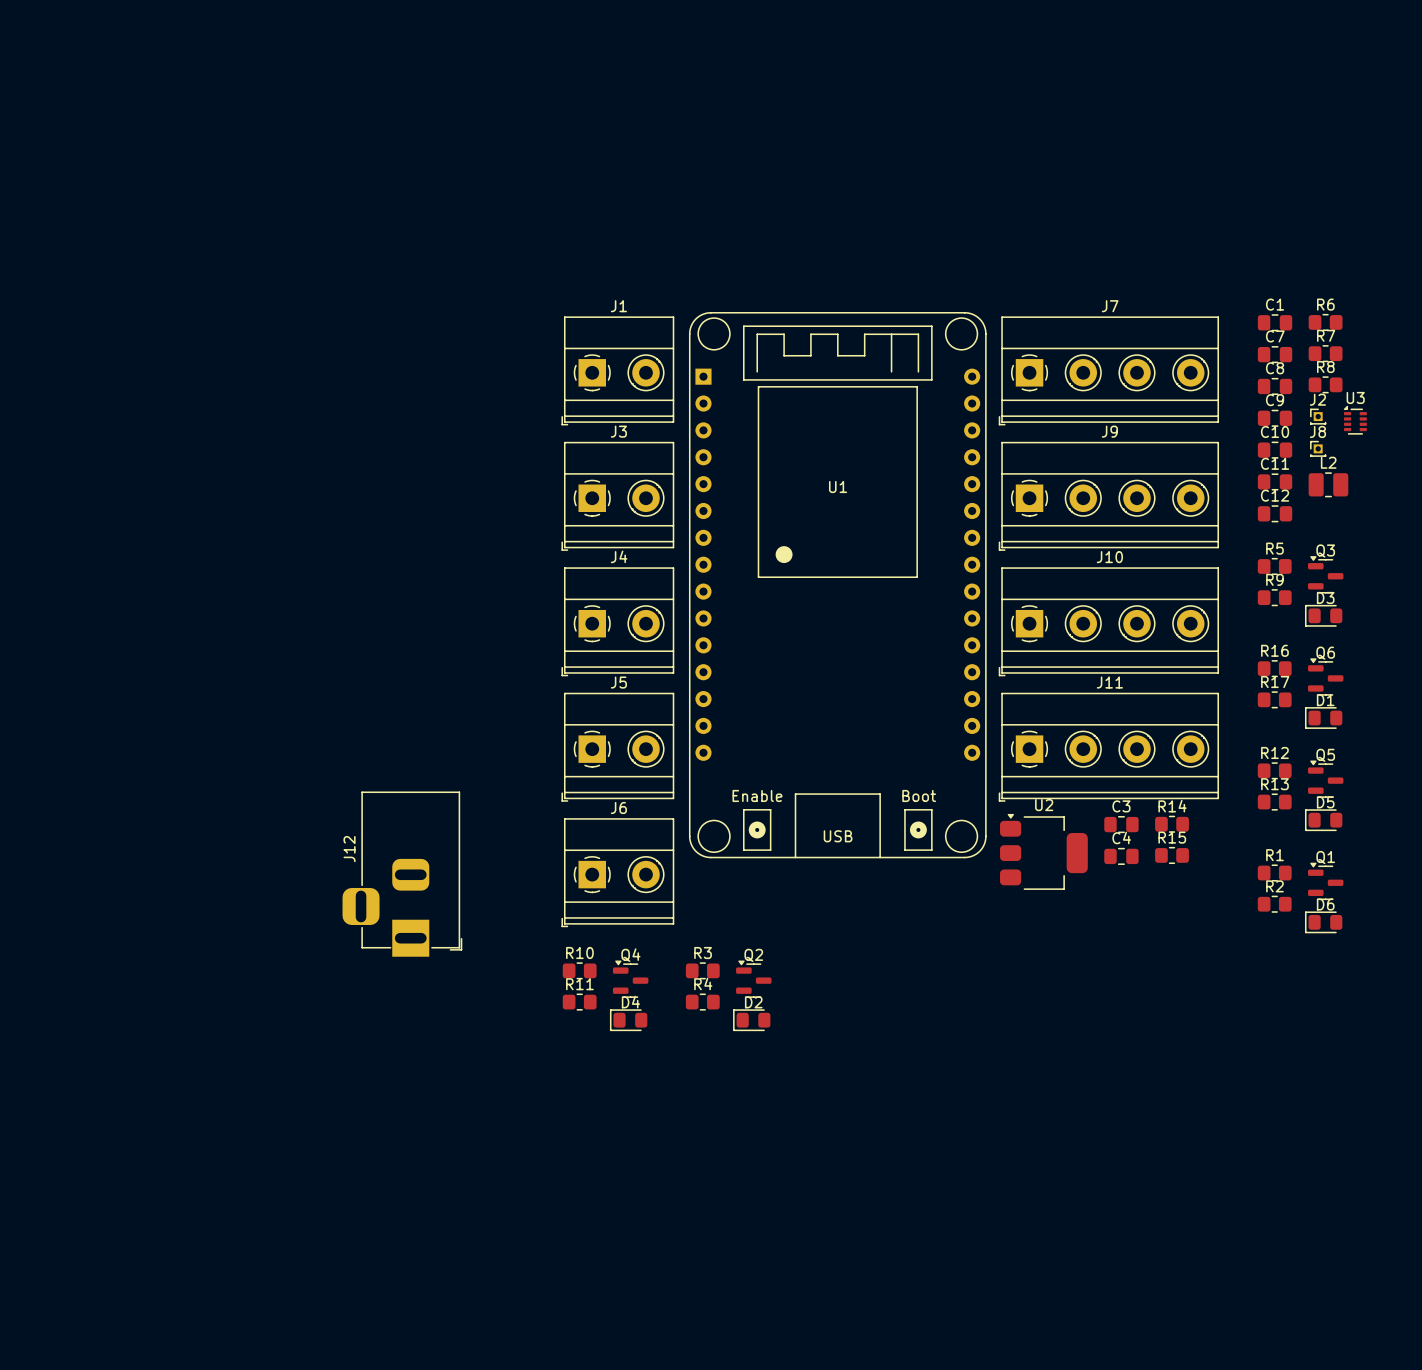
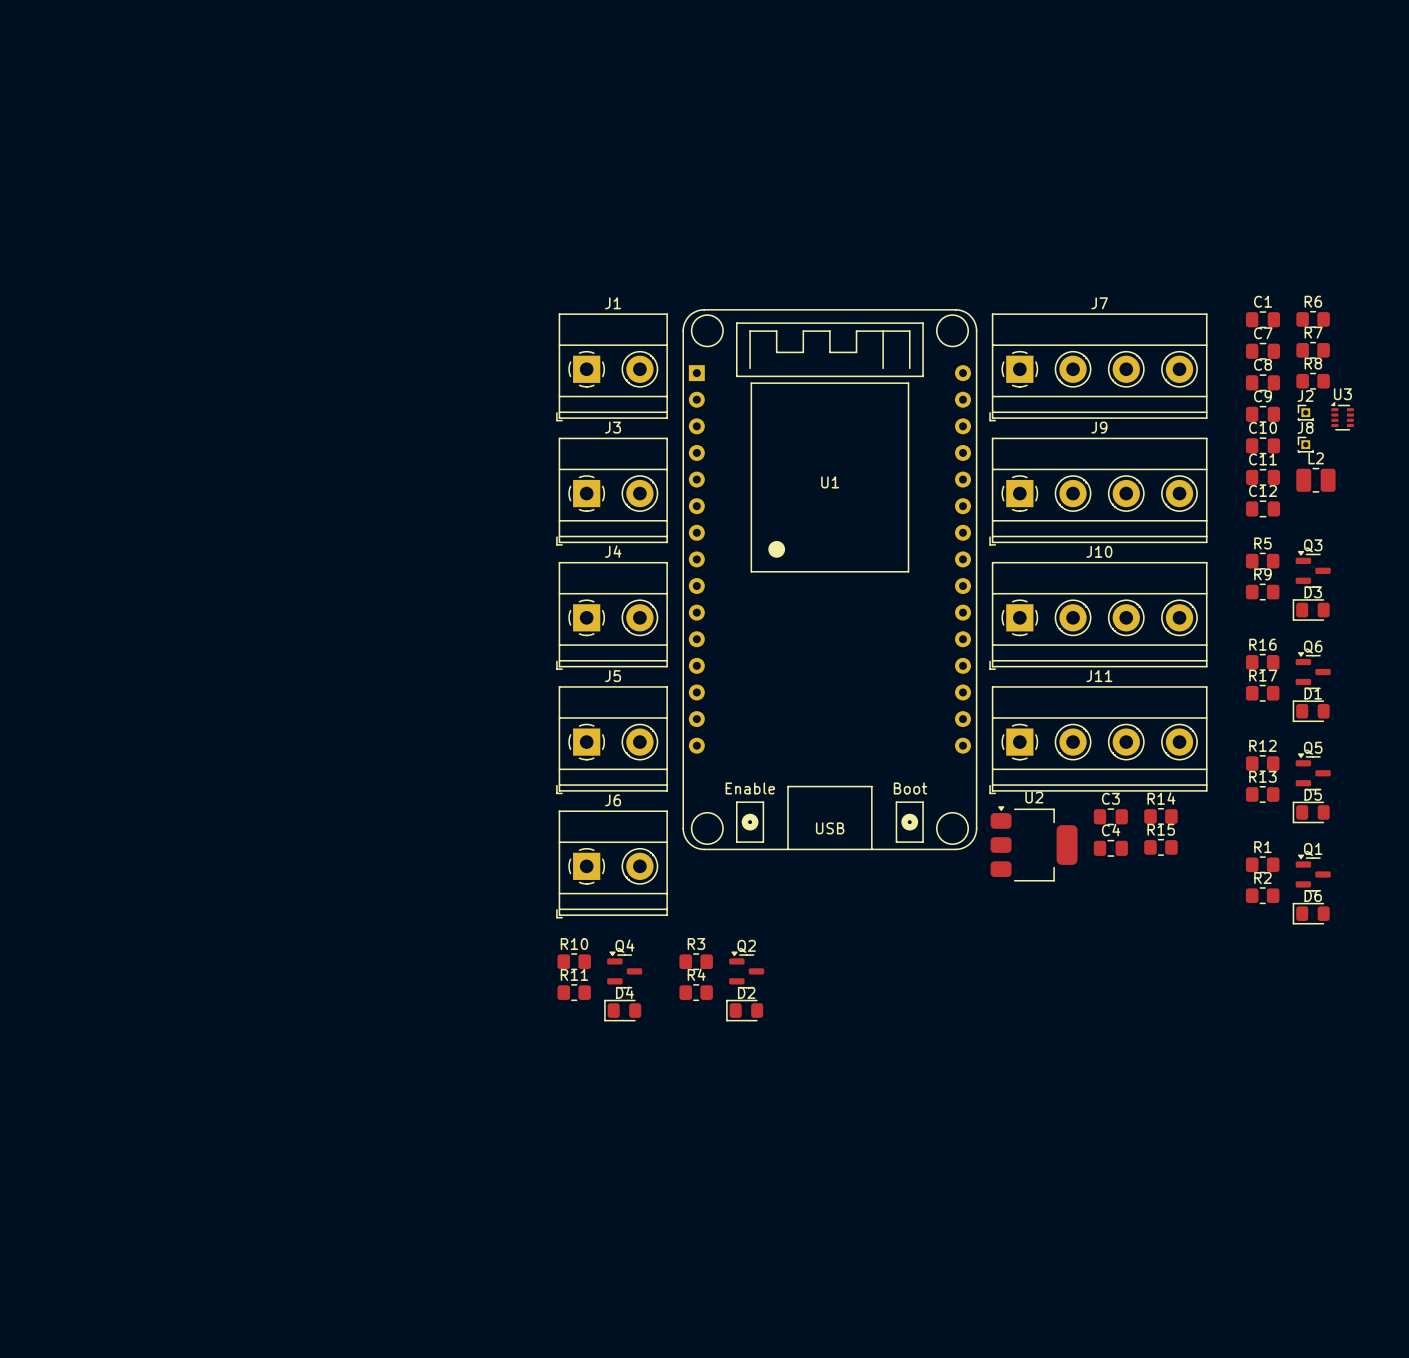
J12: (402, 874) -> none

